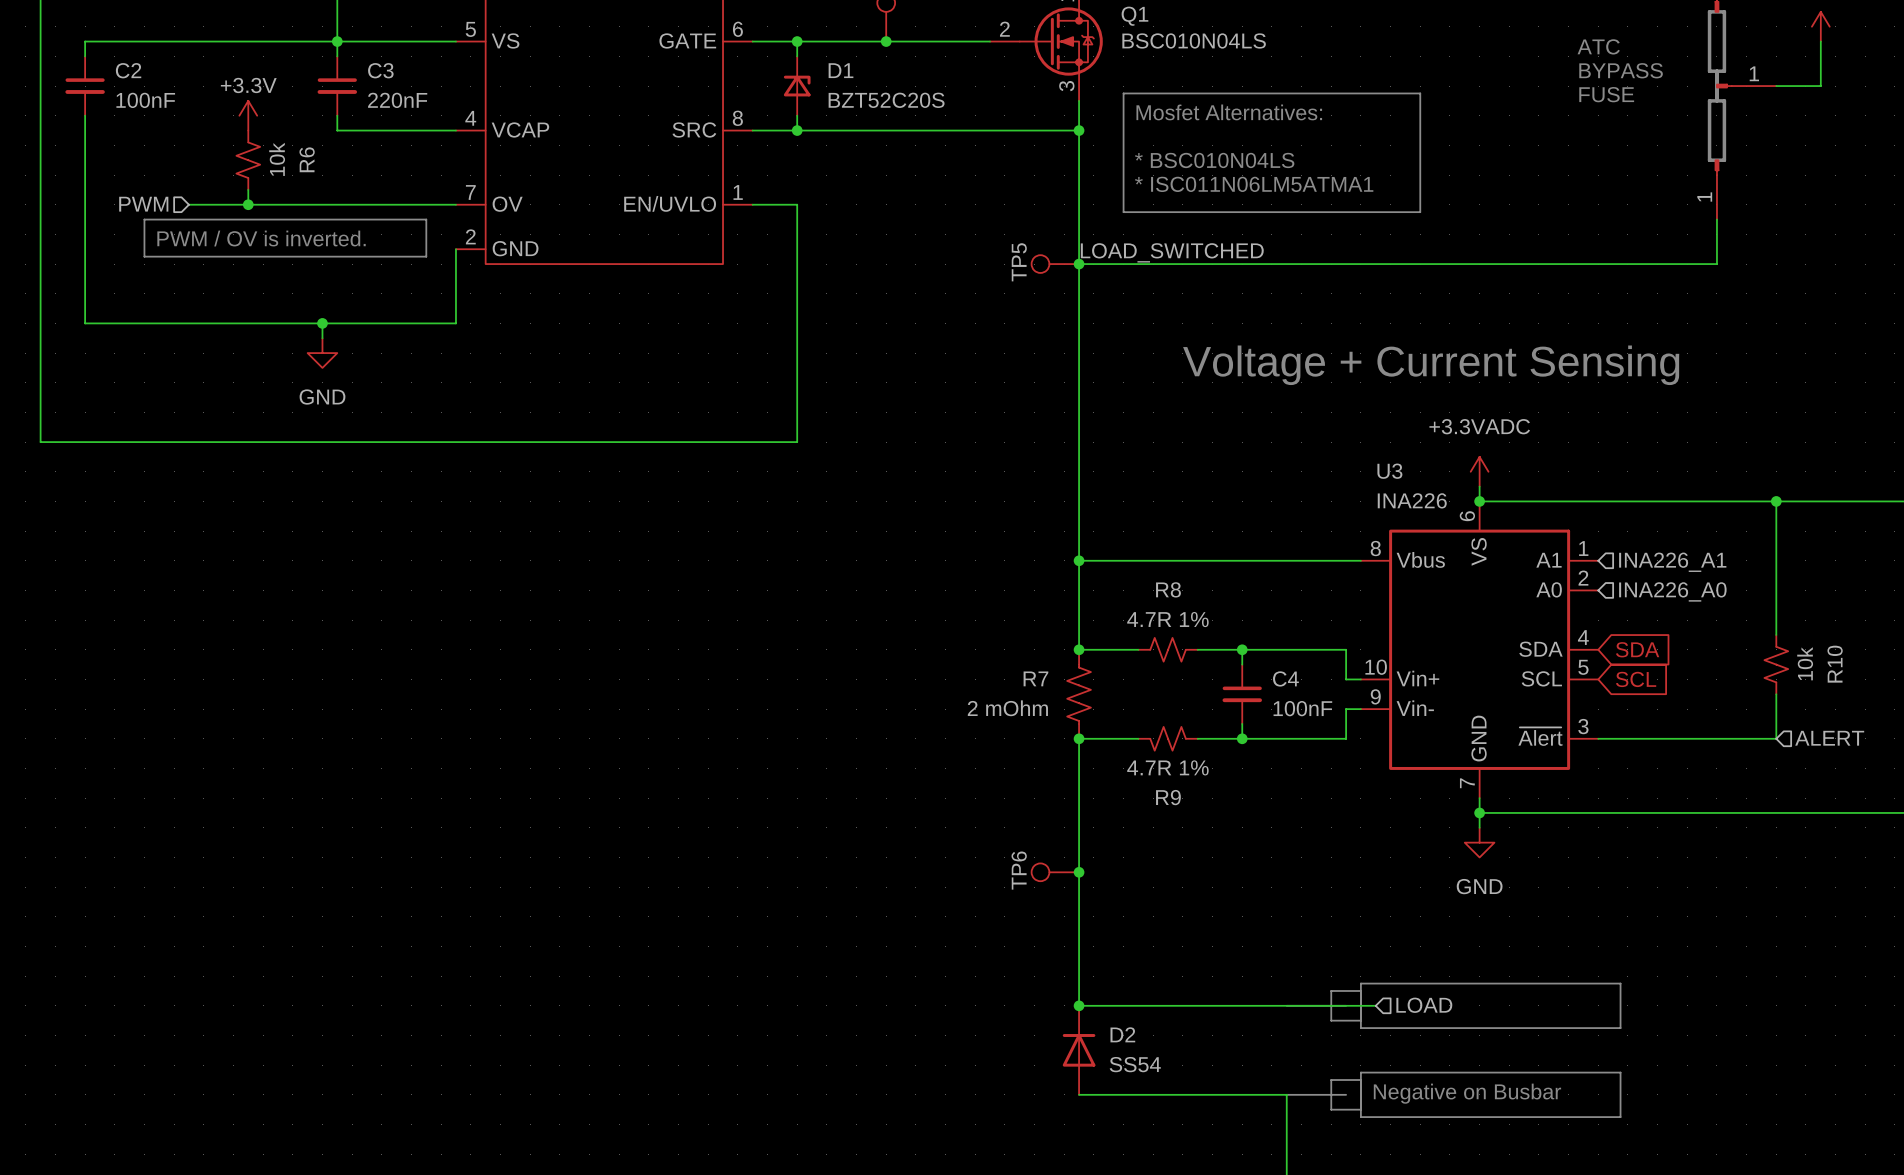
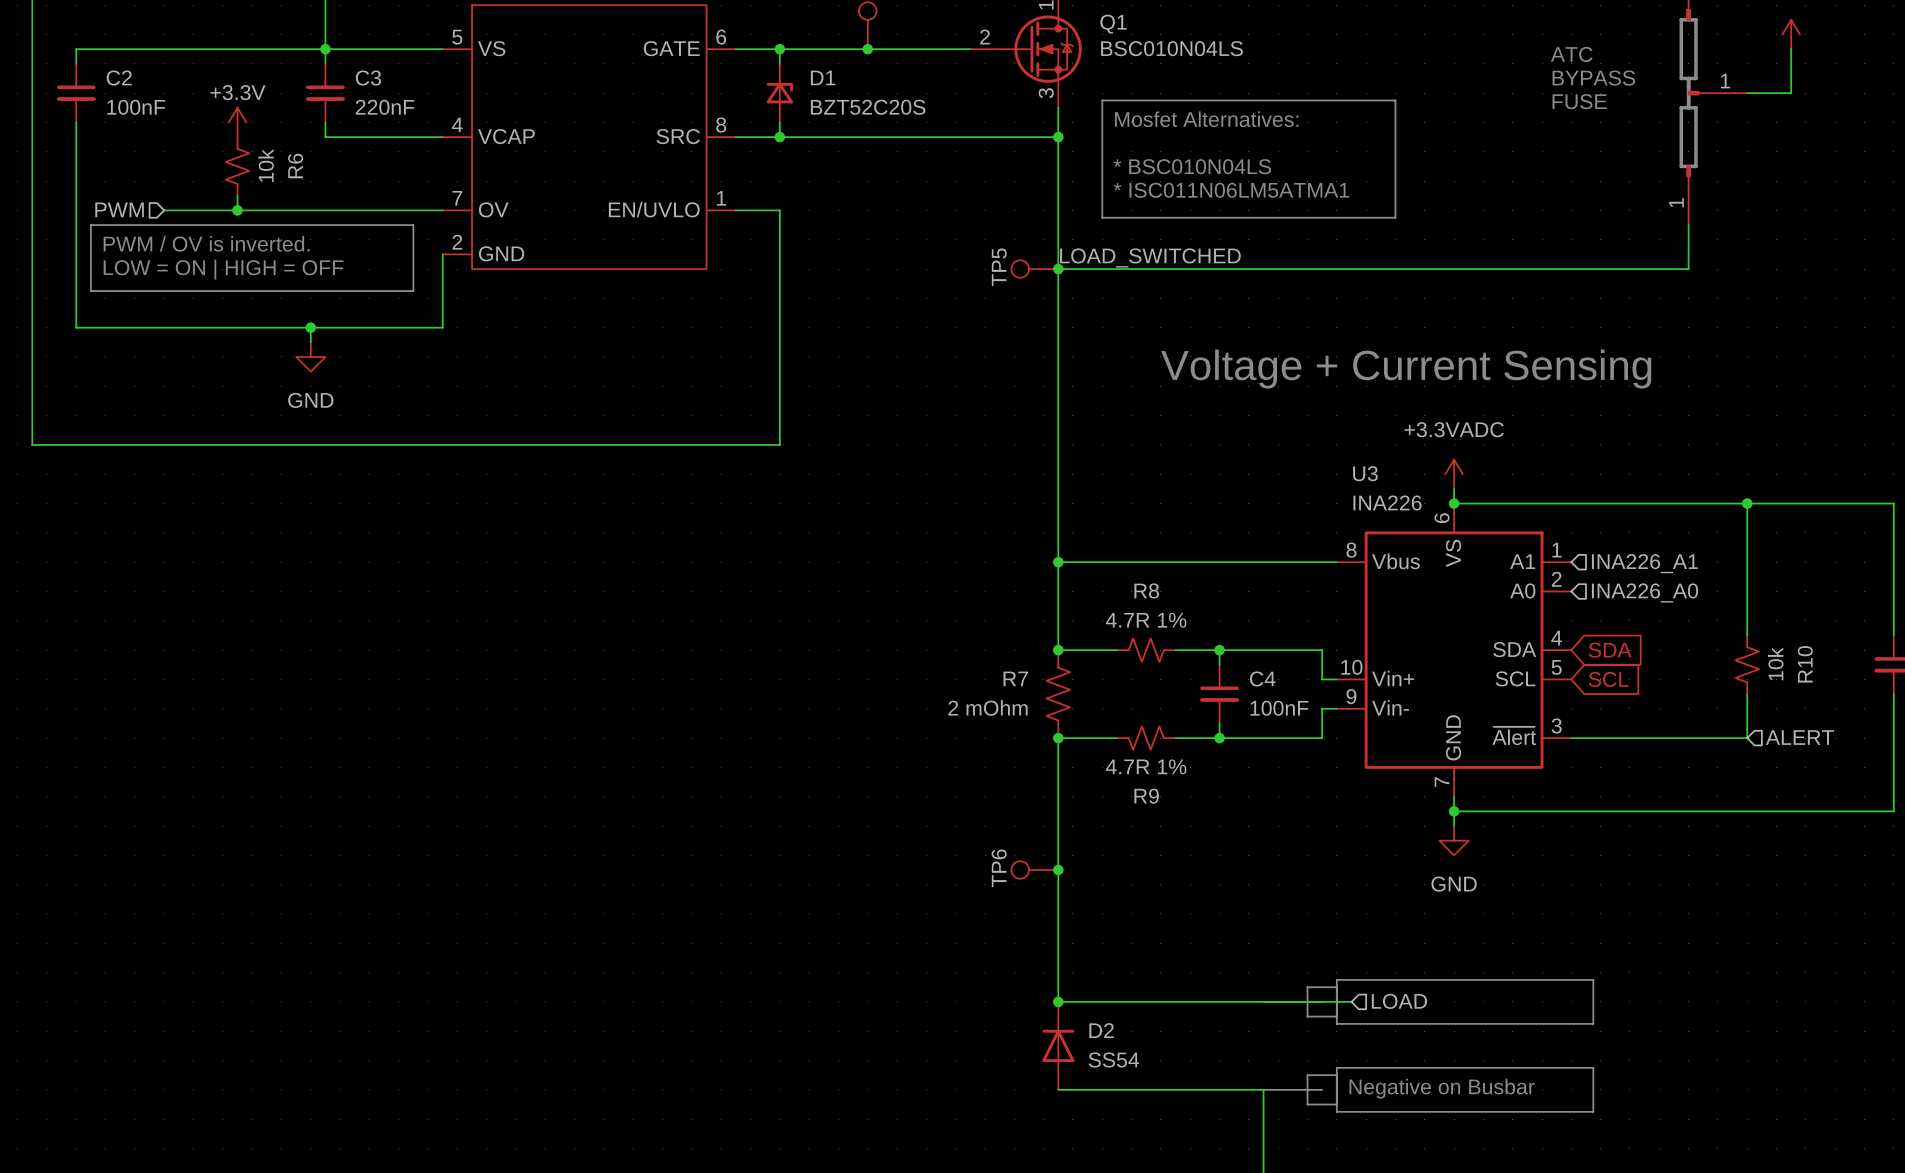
hierarchical label position: PWM (143, 204) -> PWM (119, 209)
wire: none -> (164, 210) (178, 210)
line: (144, 219) (144, 256) (426, 256) -> (134, 225) (90, 225) (90, 291) (413, 291) (413, 261)
text position: PWM / OV is inverted. (261, 238) -> PWM / OV is inverted. (206, 243)
text: none -> LOW = ON | HIGH = OFF (223, 269)

